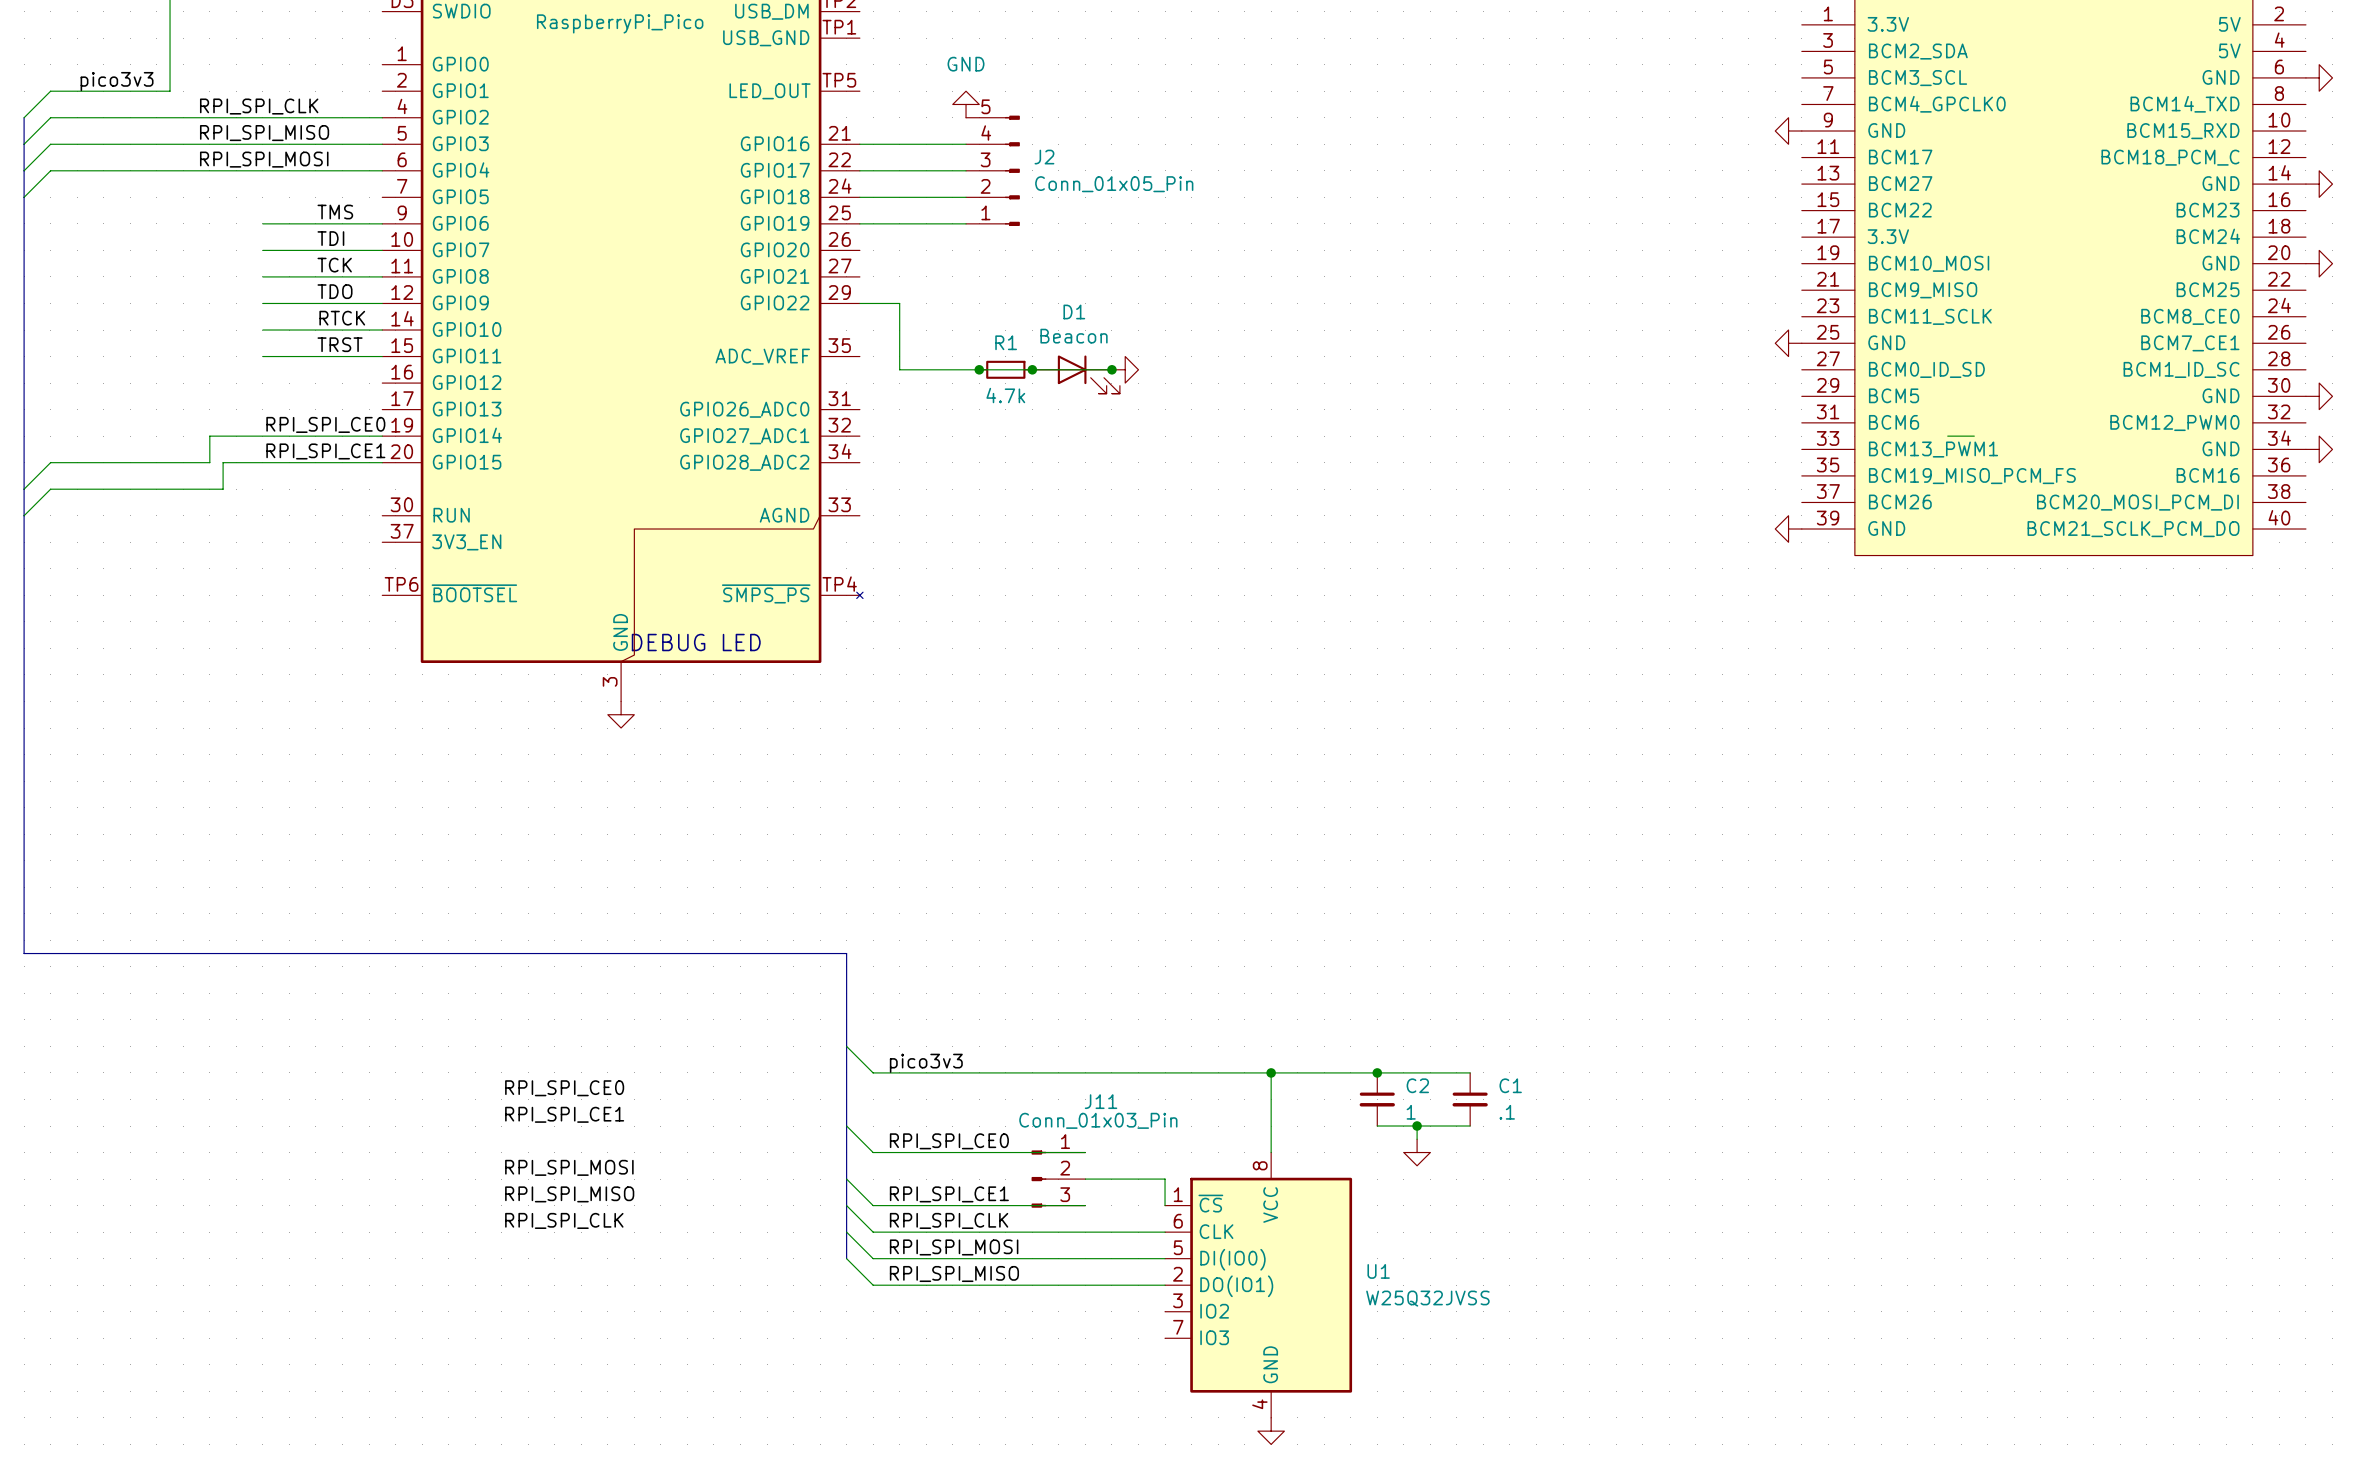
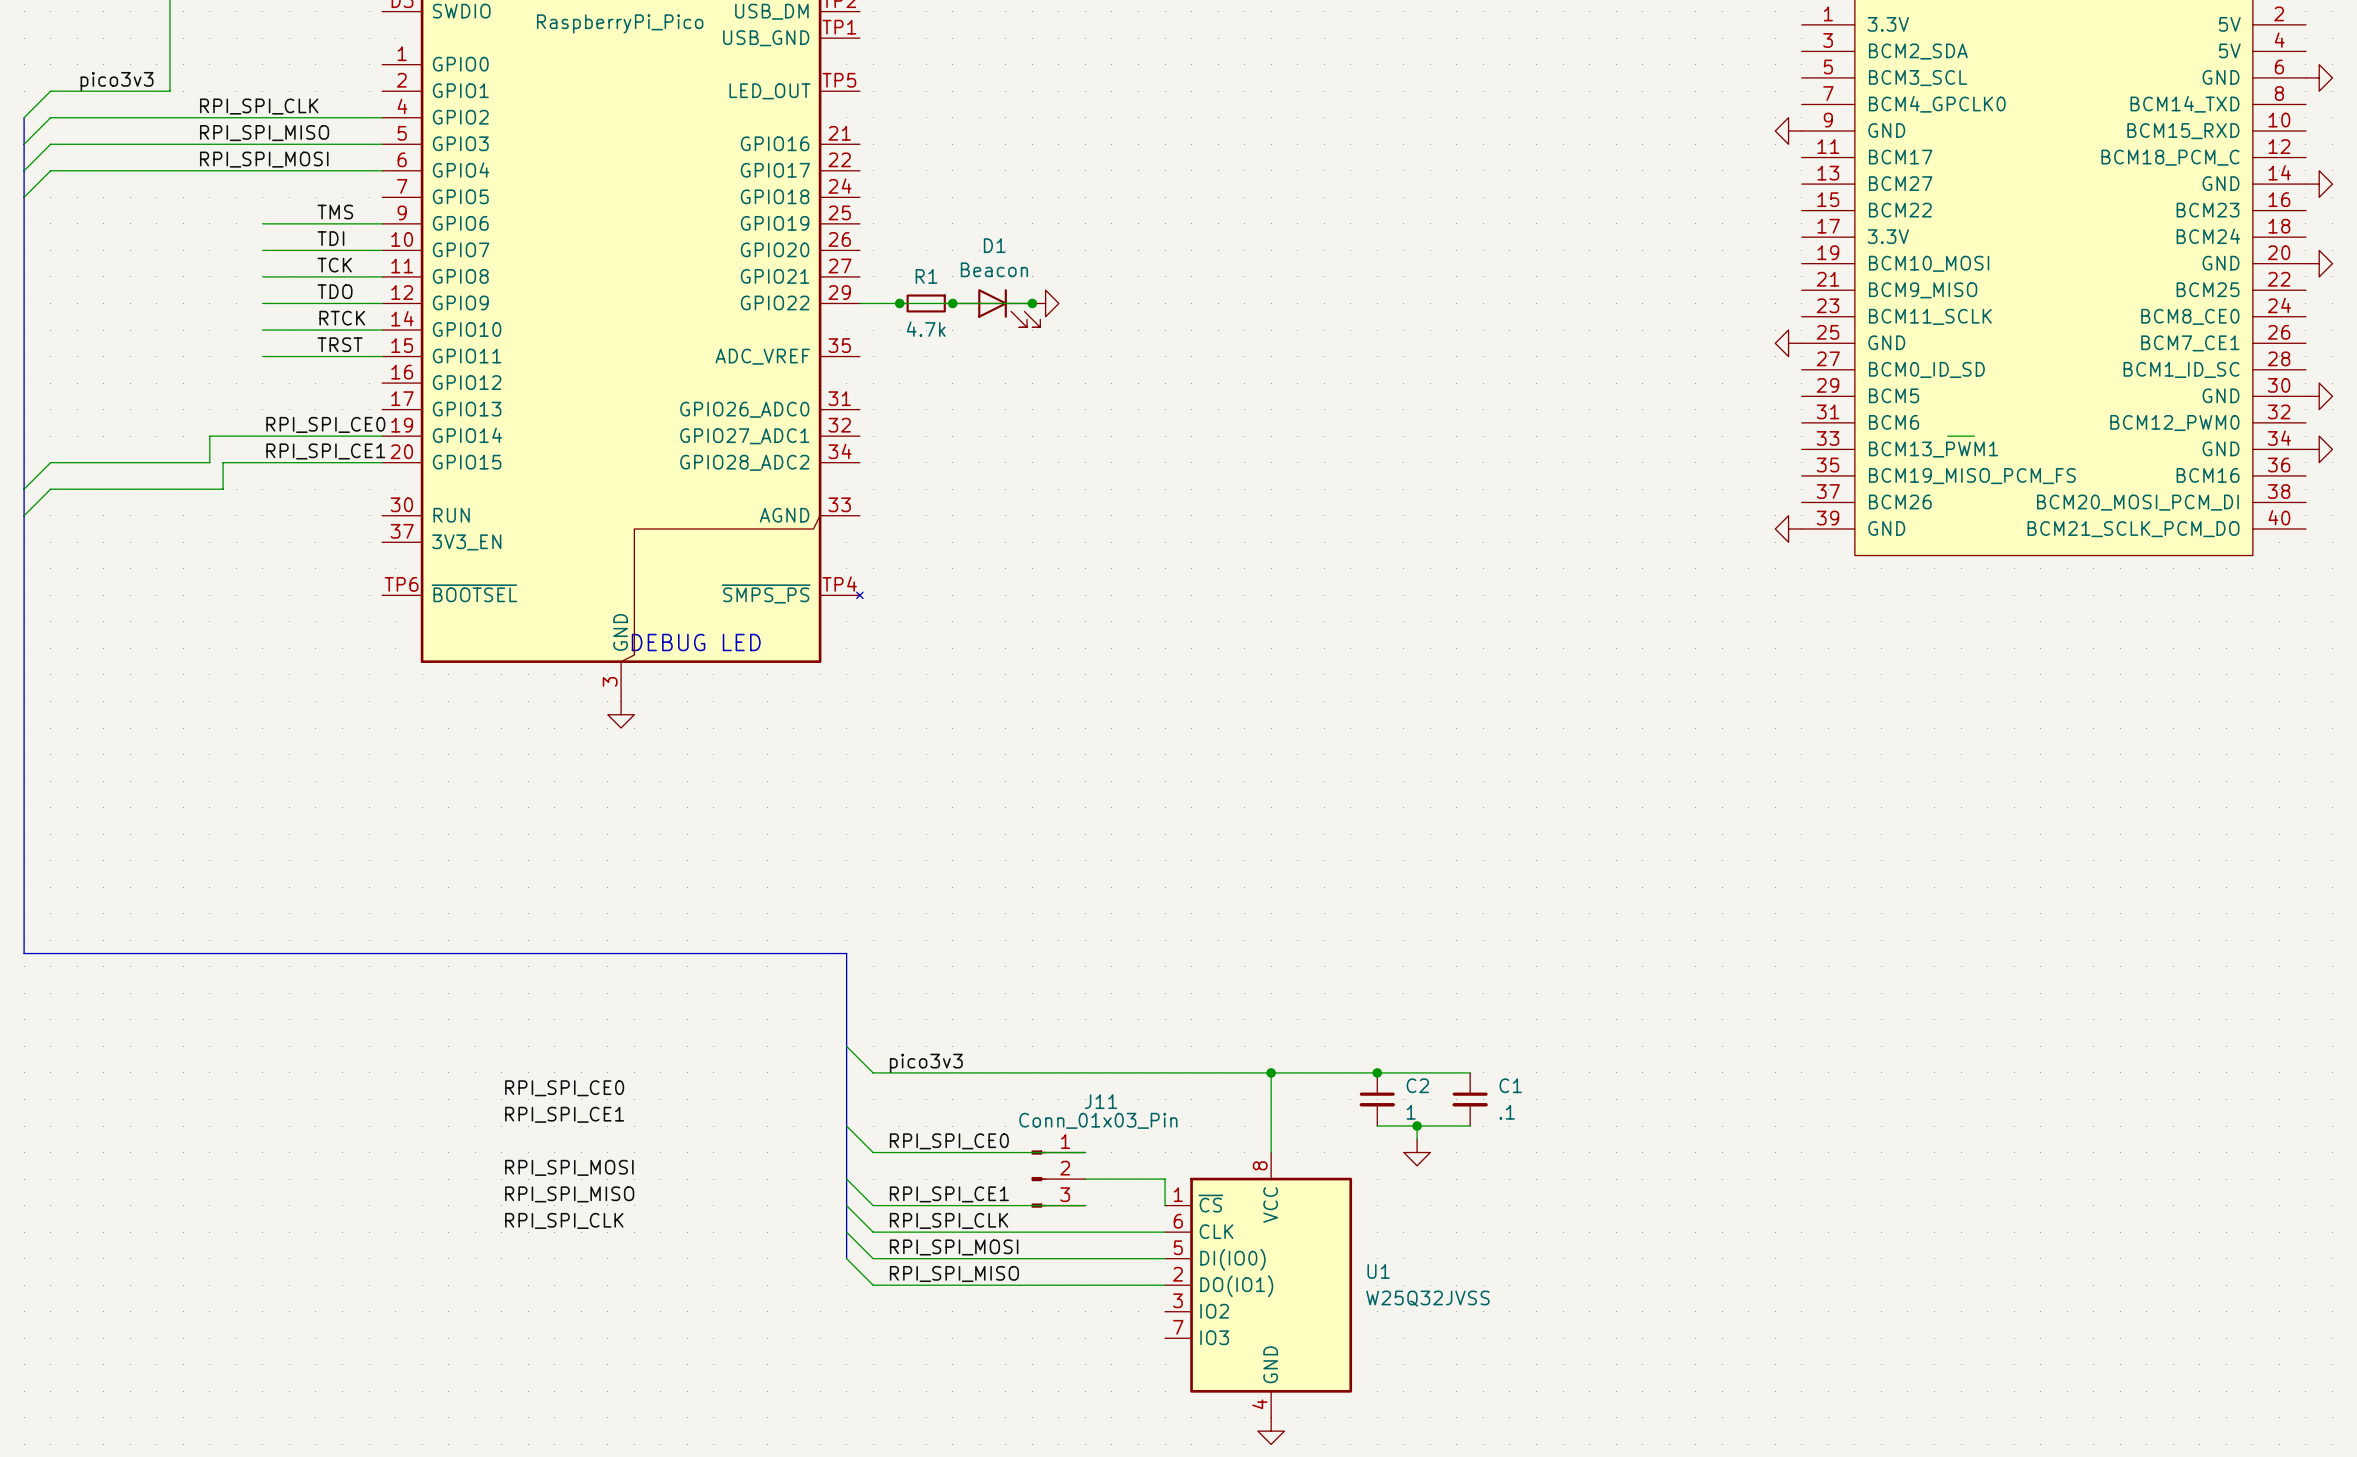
power symbol: GND (966, 104) -> none
wire: (859, 144) (966, 144) -> none
wire: (859, 170) (966, 170) -> none
J2: Conn_01x05_Pin (992, 170) -> none
wire: (859, 197) (966, 197) -> none
wire: (859, 223) (966, 223) -> none
wire: (899, 303) (899, 369) (1111, 369) -> (899, 303) (1032, 303)
junction: none -> (899, 303)
junction: none -> (952, 303)
junction: none -> (1032, 303)
junction: (979, 369) -> none
R1 position: (1005, 369) -> (926, 303)
junction: (1032, 369) -> none
junction: (1111, 369) -> none
power symbol position: (1125, 369) -> (1045, 303)
D1 position: (1076, 374) -> (996, 308)

